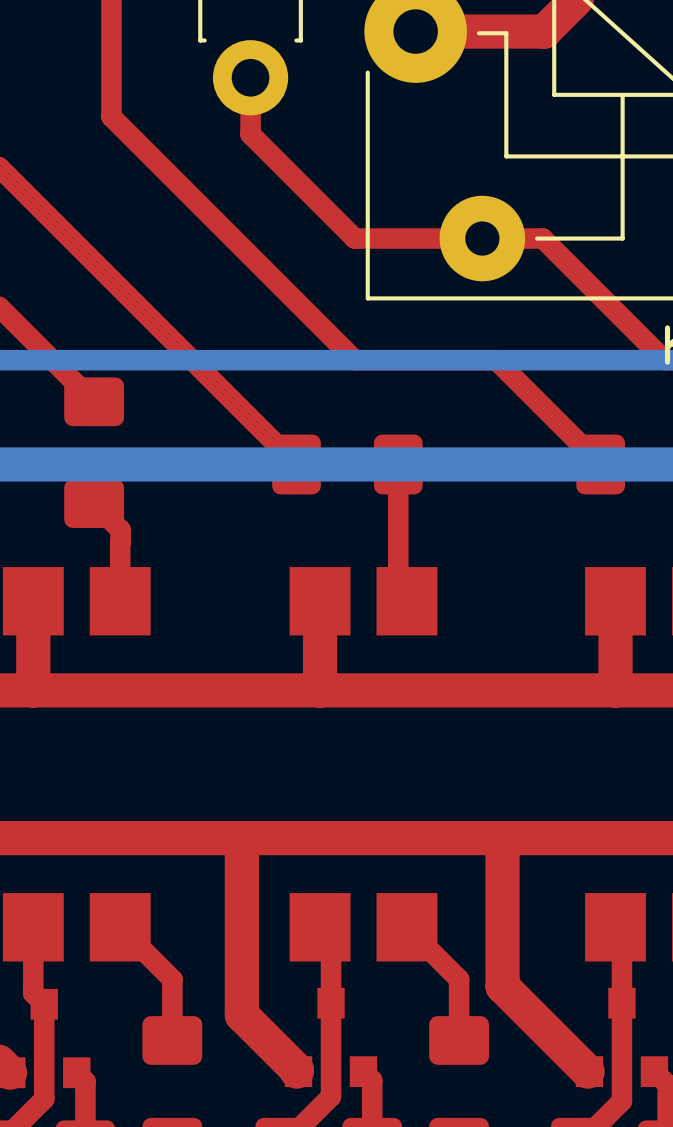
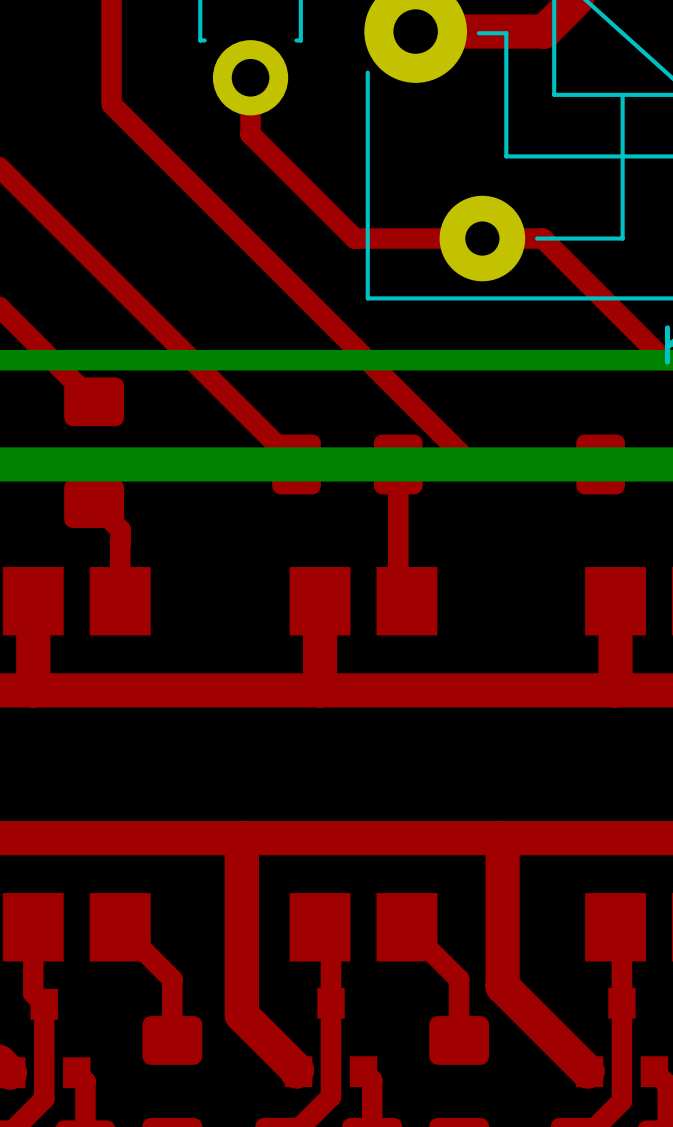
top track: (111, 99) (111, 116) (354, 360) (496, 360) (600, 464) -> (111, 104) (471, 464) (600, 464)

